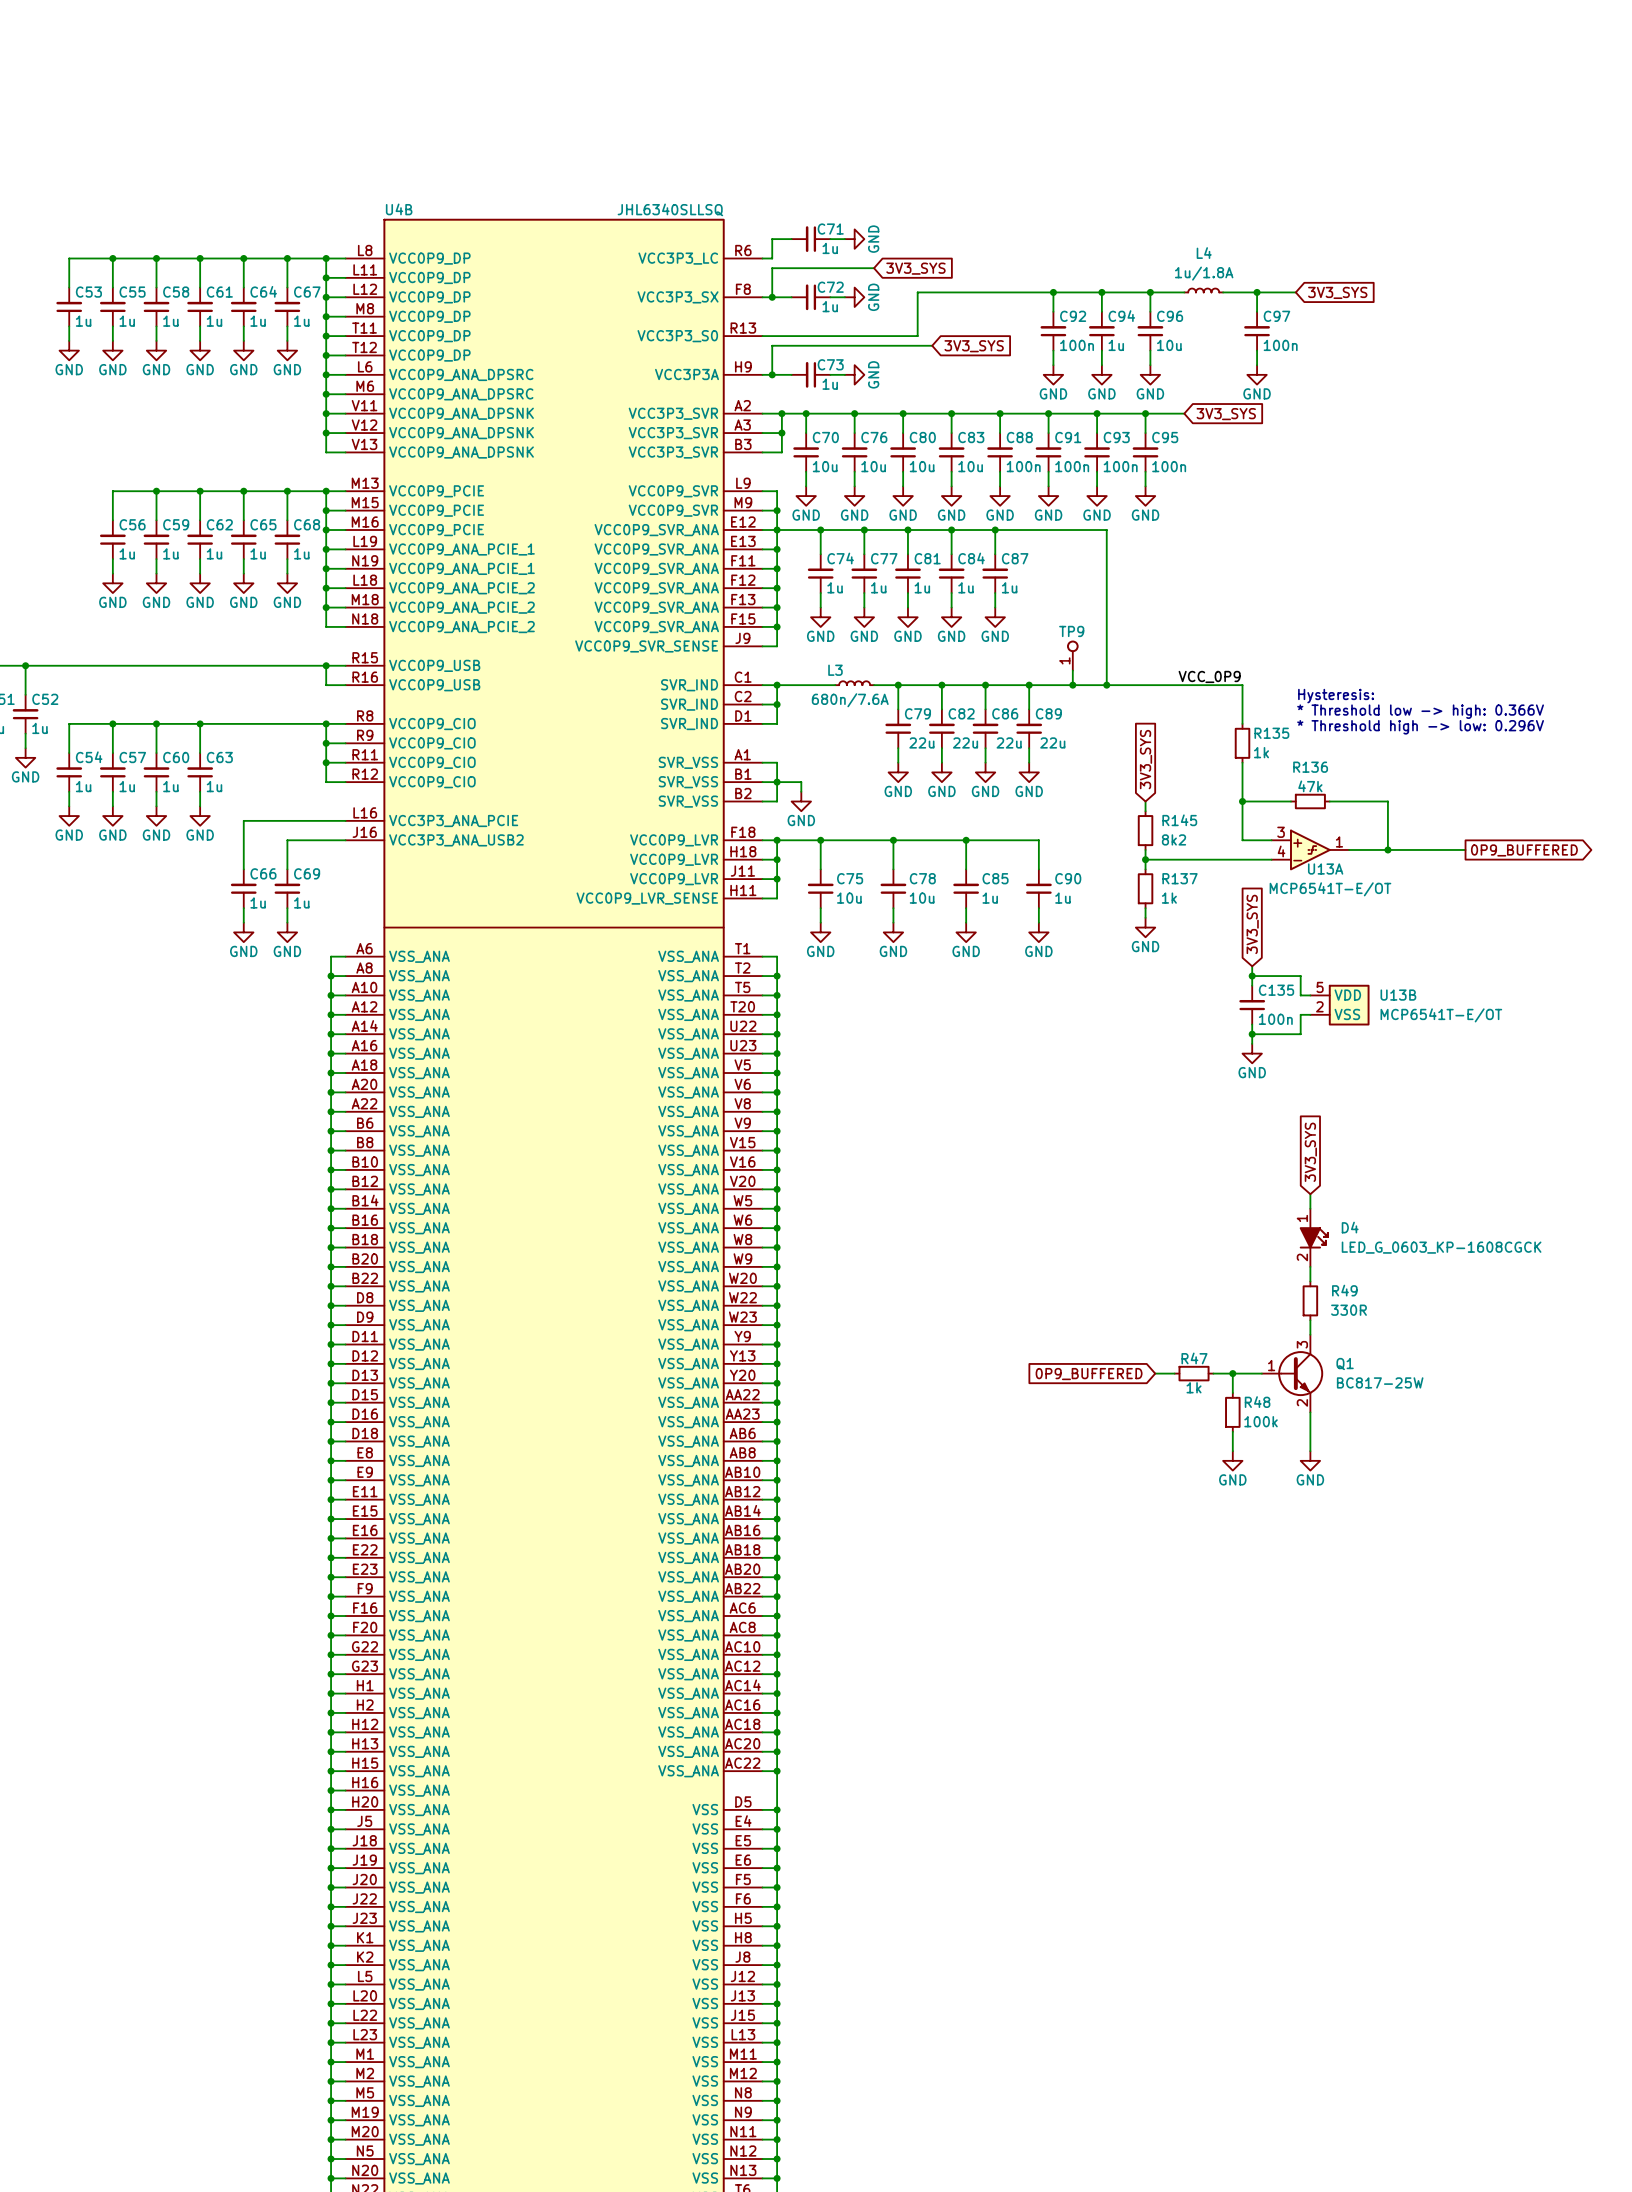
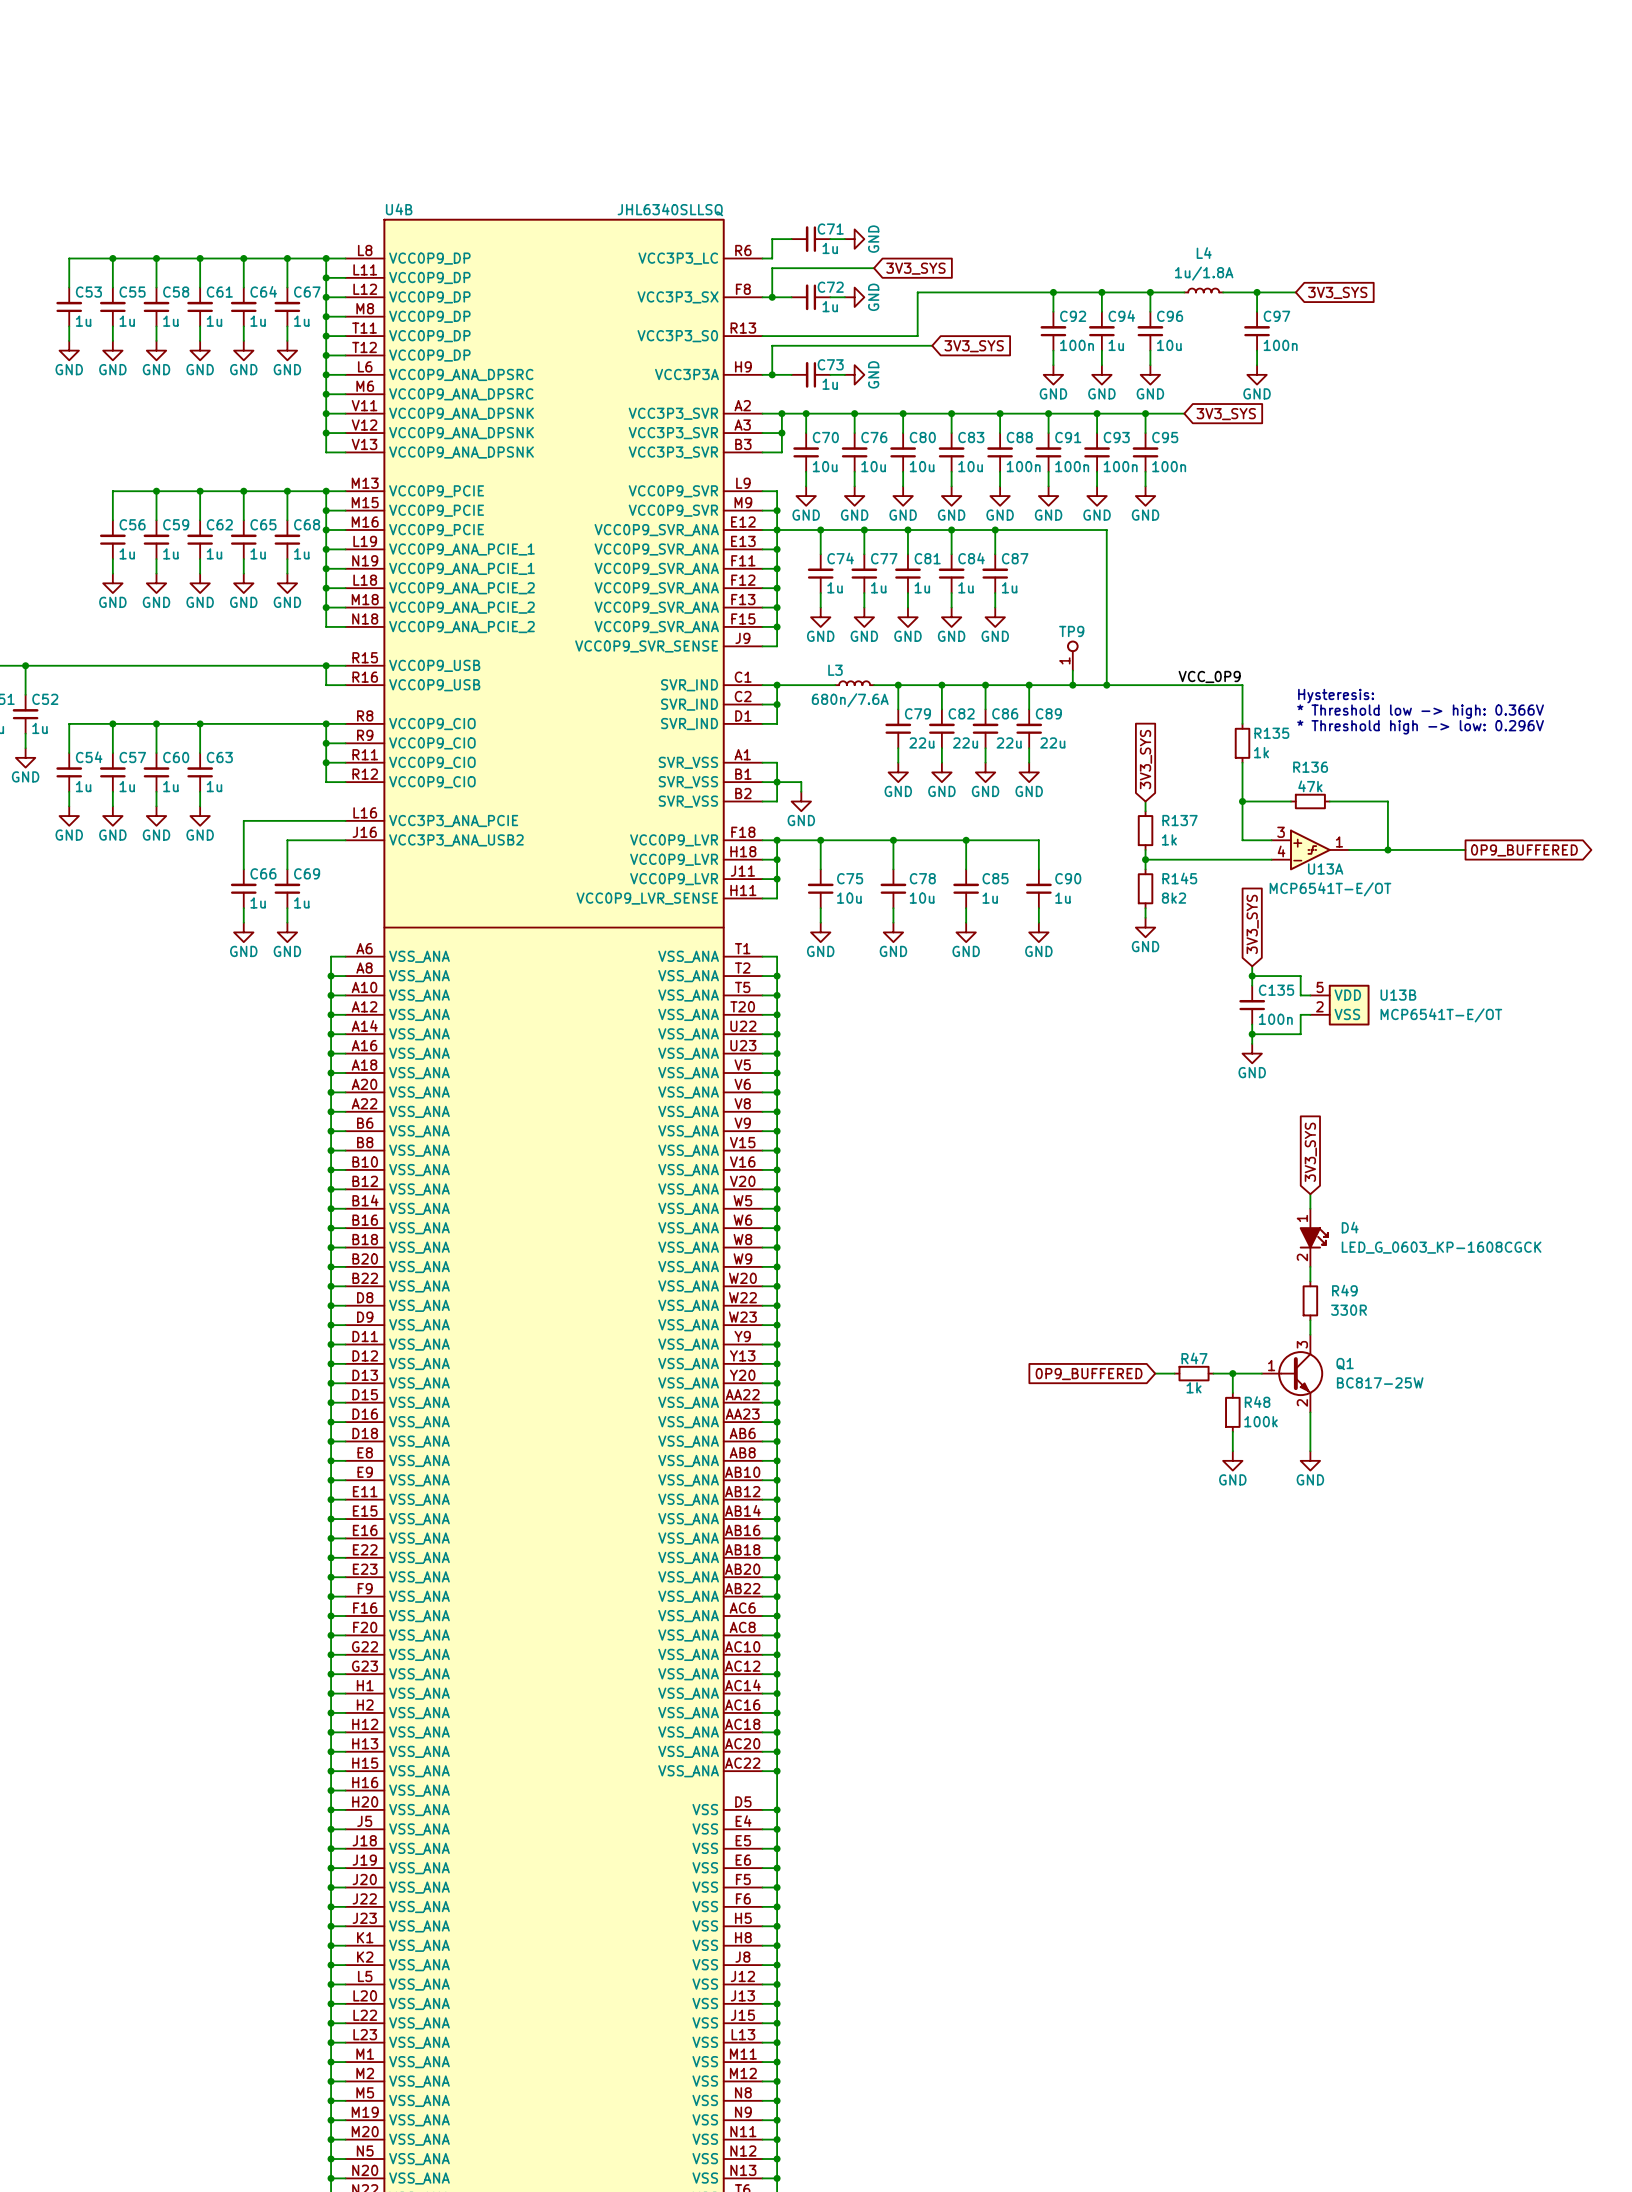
R145 name: R145 (1179, 820) -> R137 (1180, 820)
R145 text: 8k2 (1174, 839) -> 1k (1169, 839)
R137 name: R137 (1180, 878) -> R145 (1179, 878)
R137 text: 1k (1169, 898) -> 8k2 (1174, 898)

